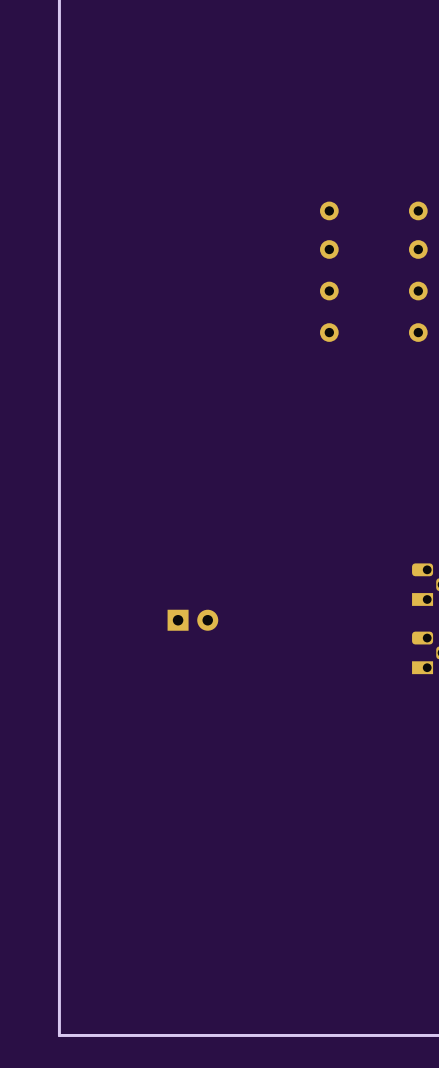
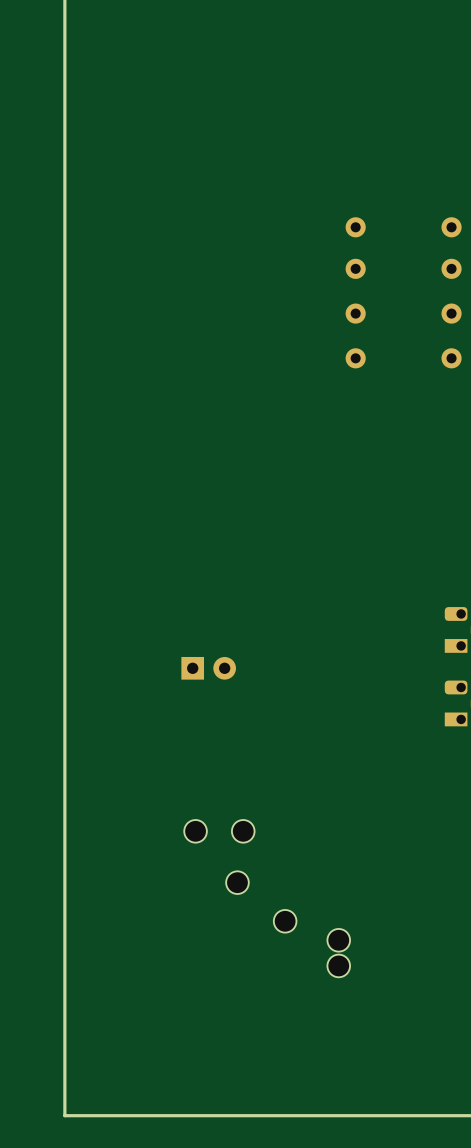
part: none -> (195, 831)
part: none -> (243, 831)
part: none -> (237, 882)
part: none -> (285, 921)
part: none -> (338, 940)
part: none -> (338, 965)

